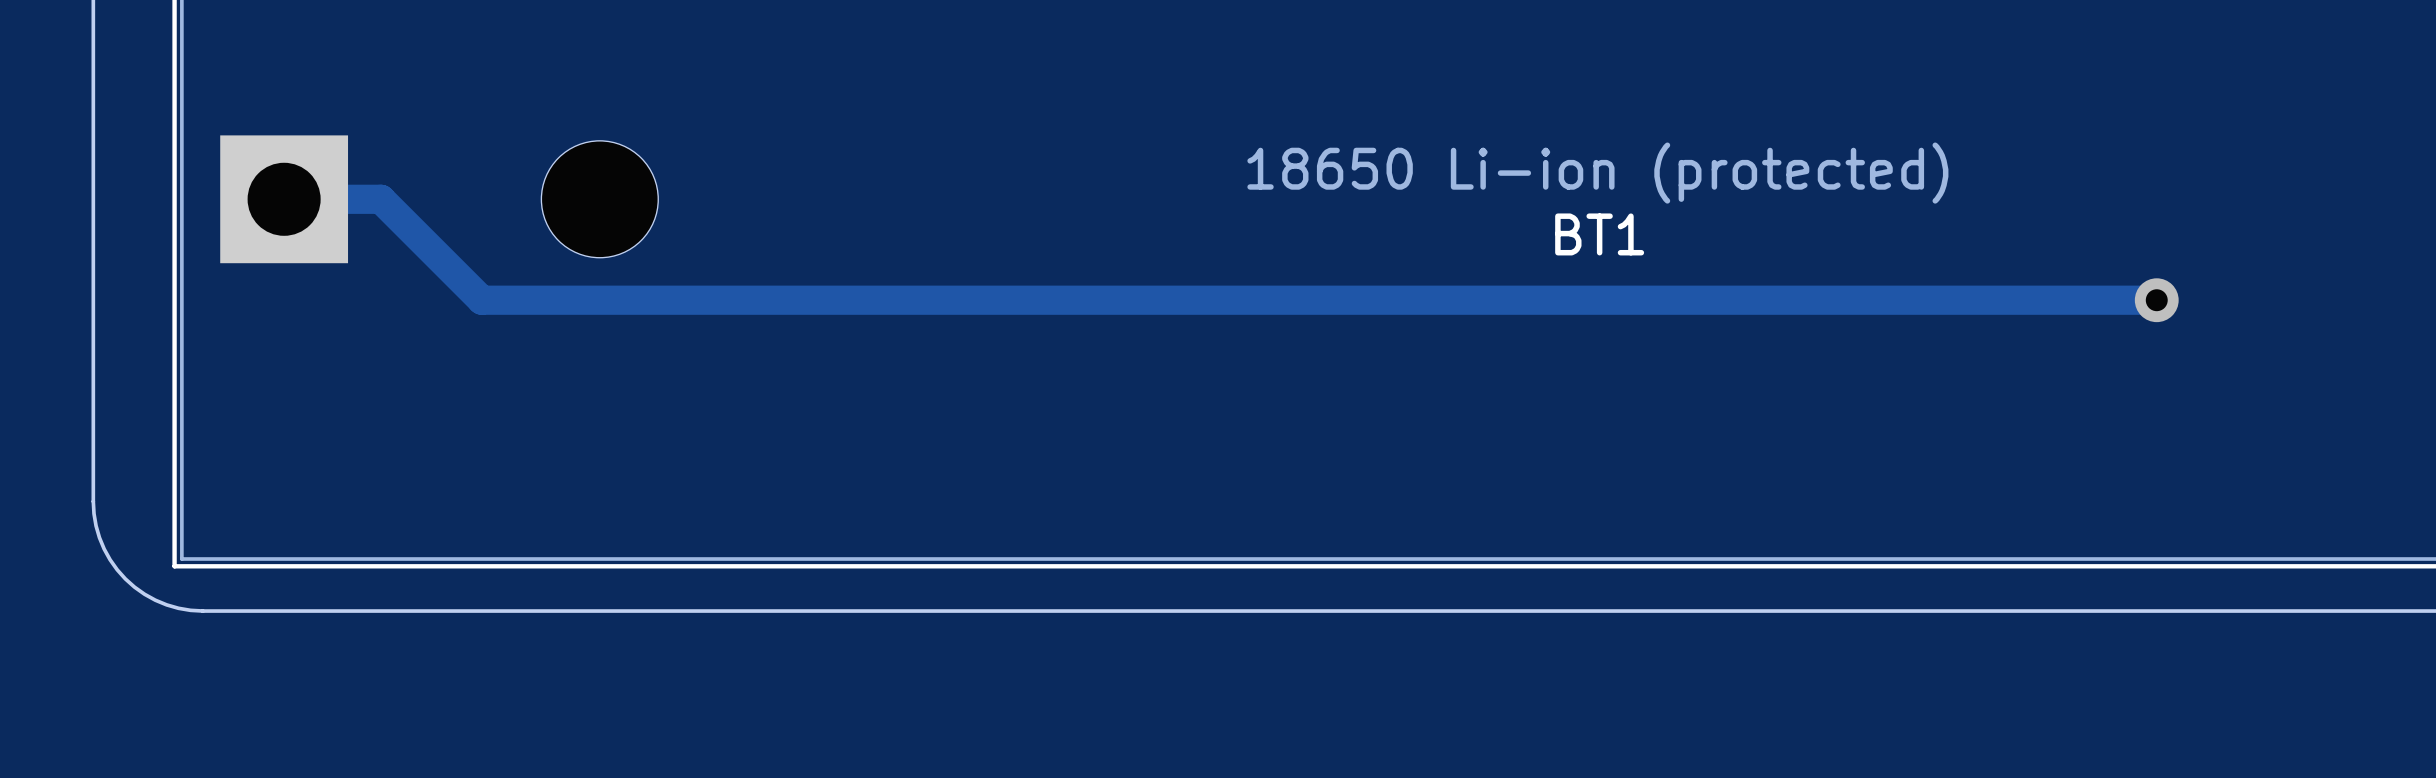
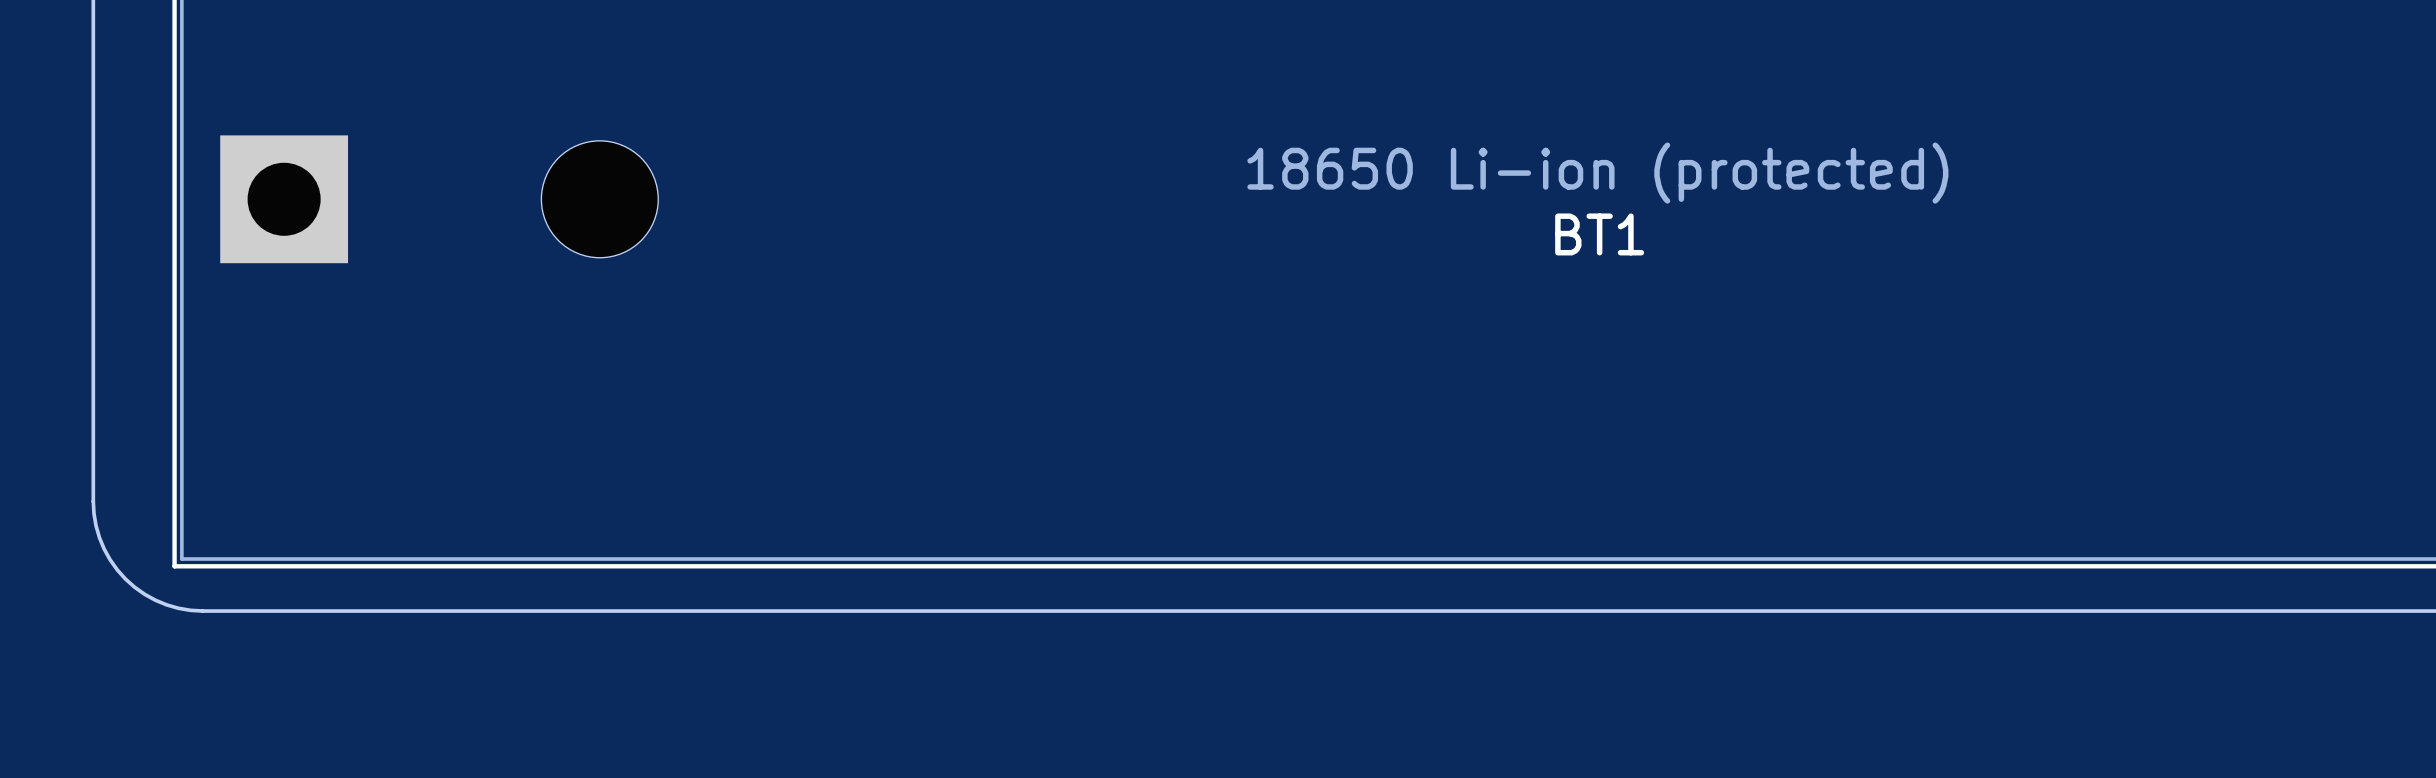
track: (284, 199) (380, 199) (481, 300) (2156, 300) -> none
via: (2156, 300) -> none

